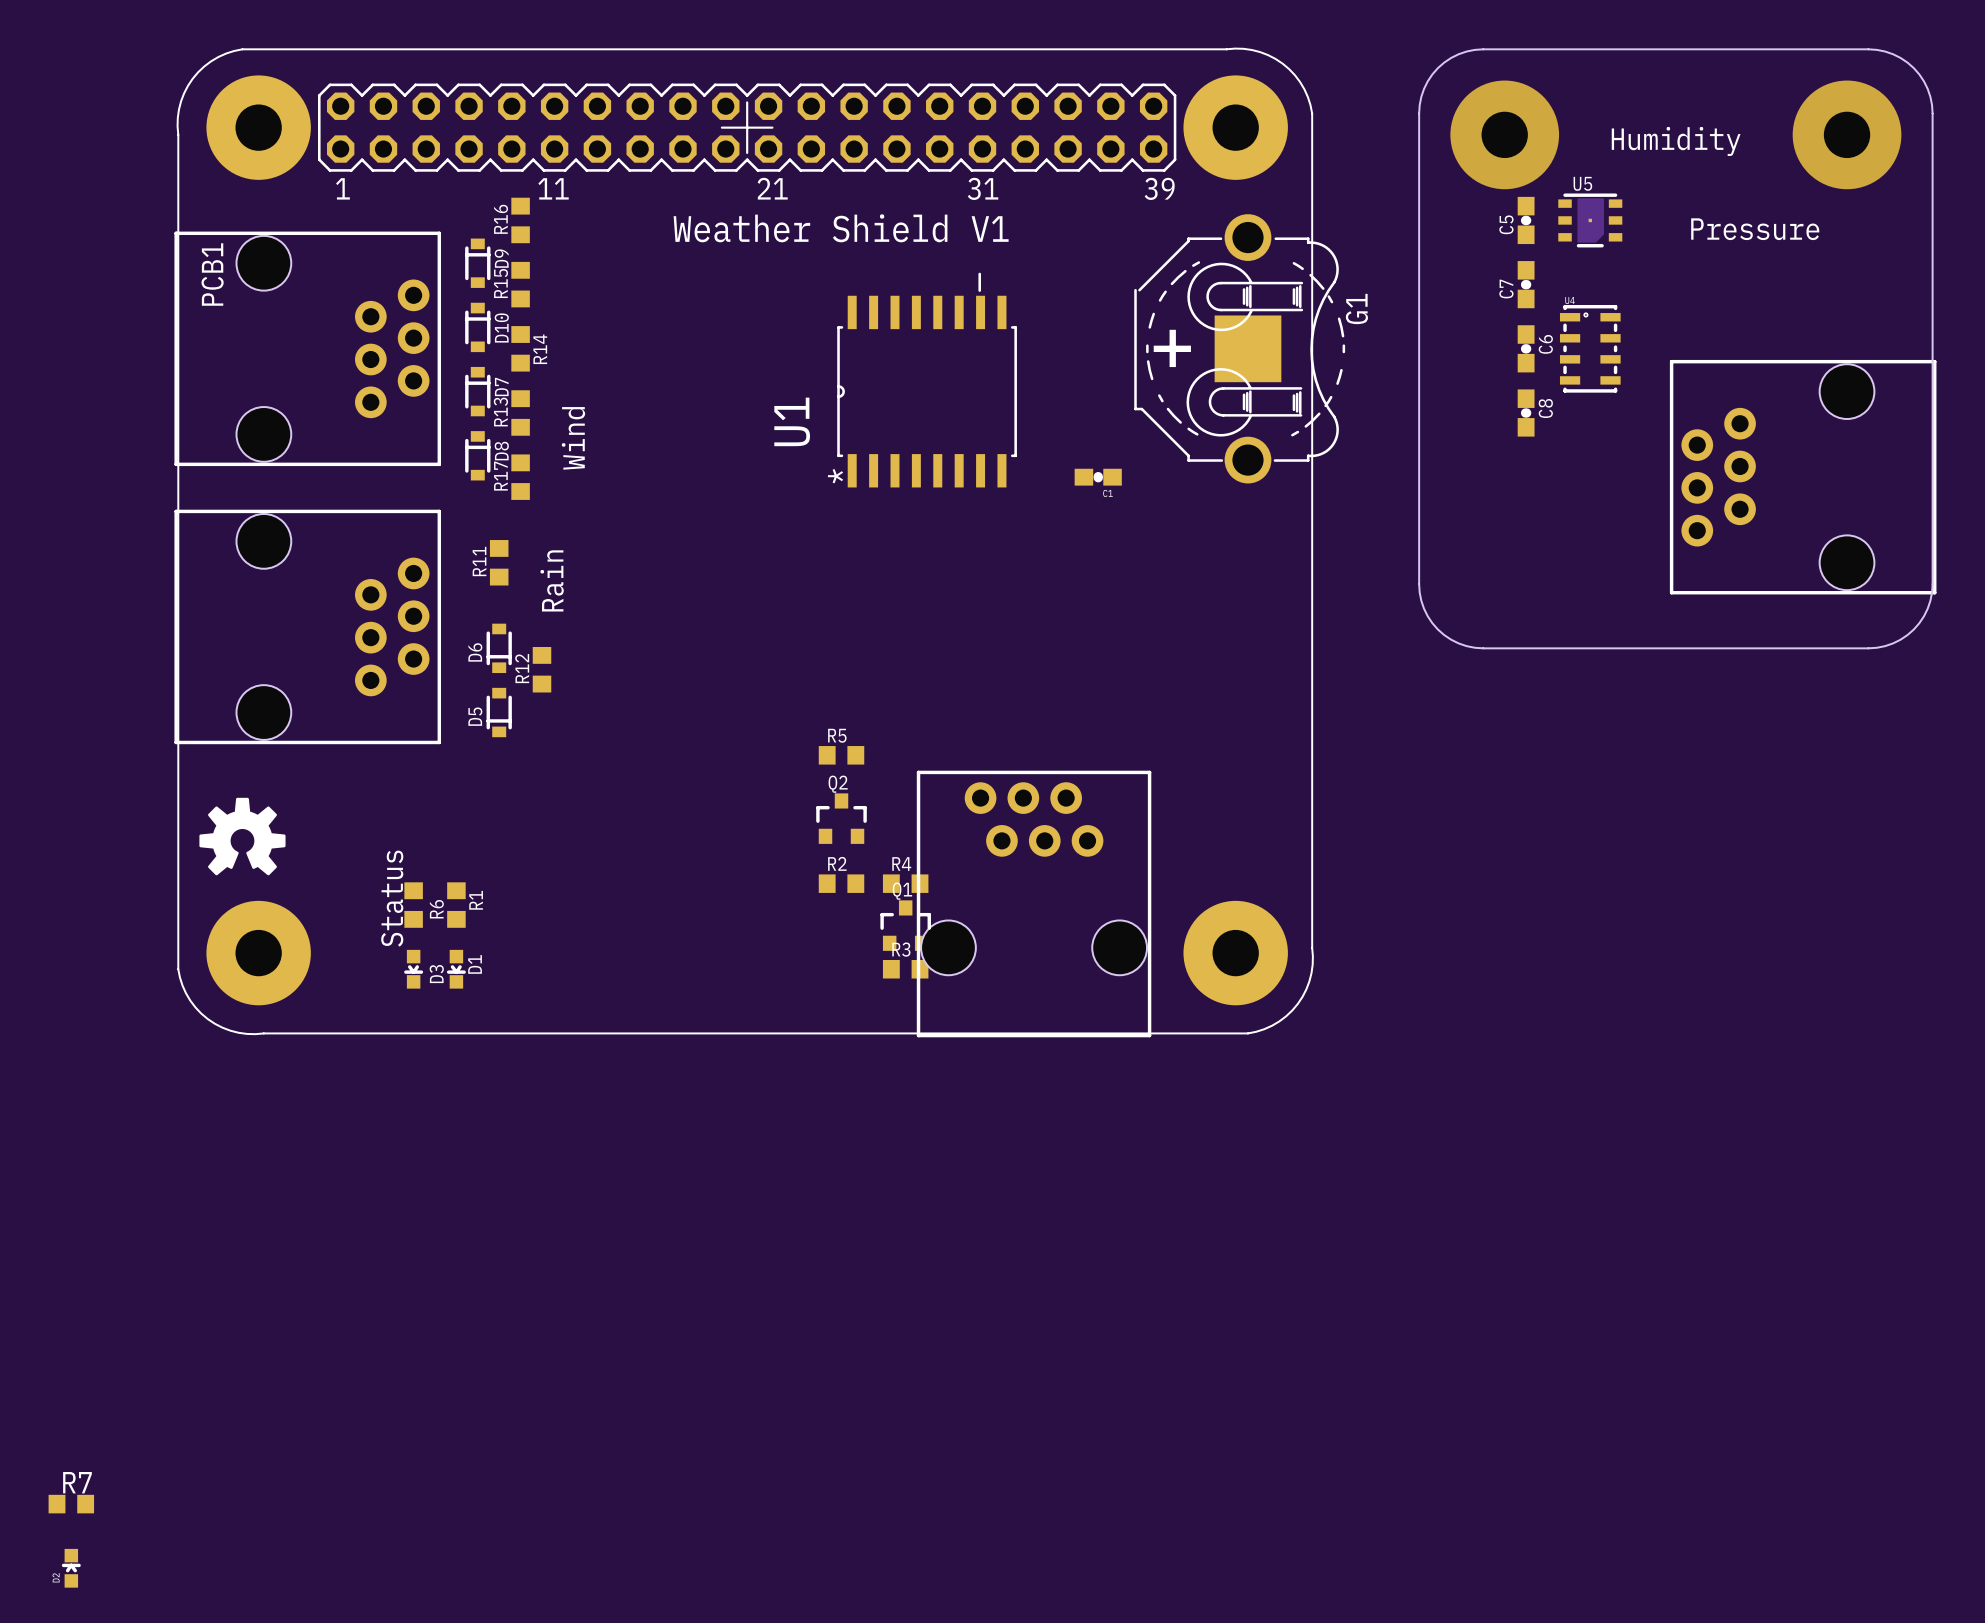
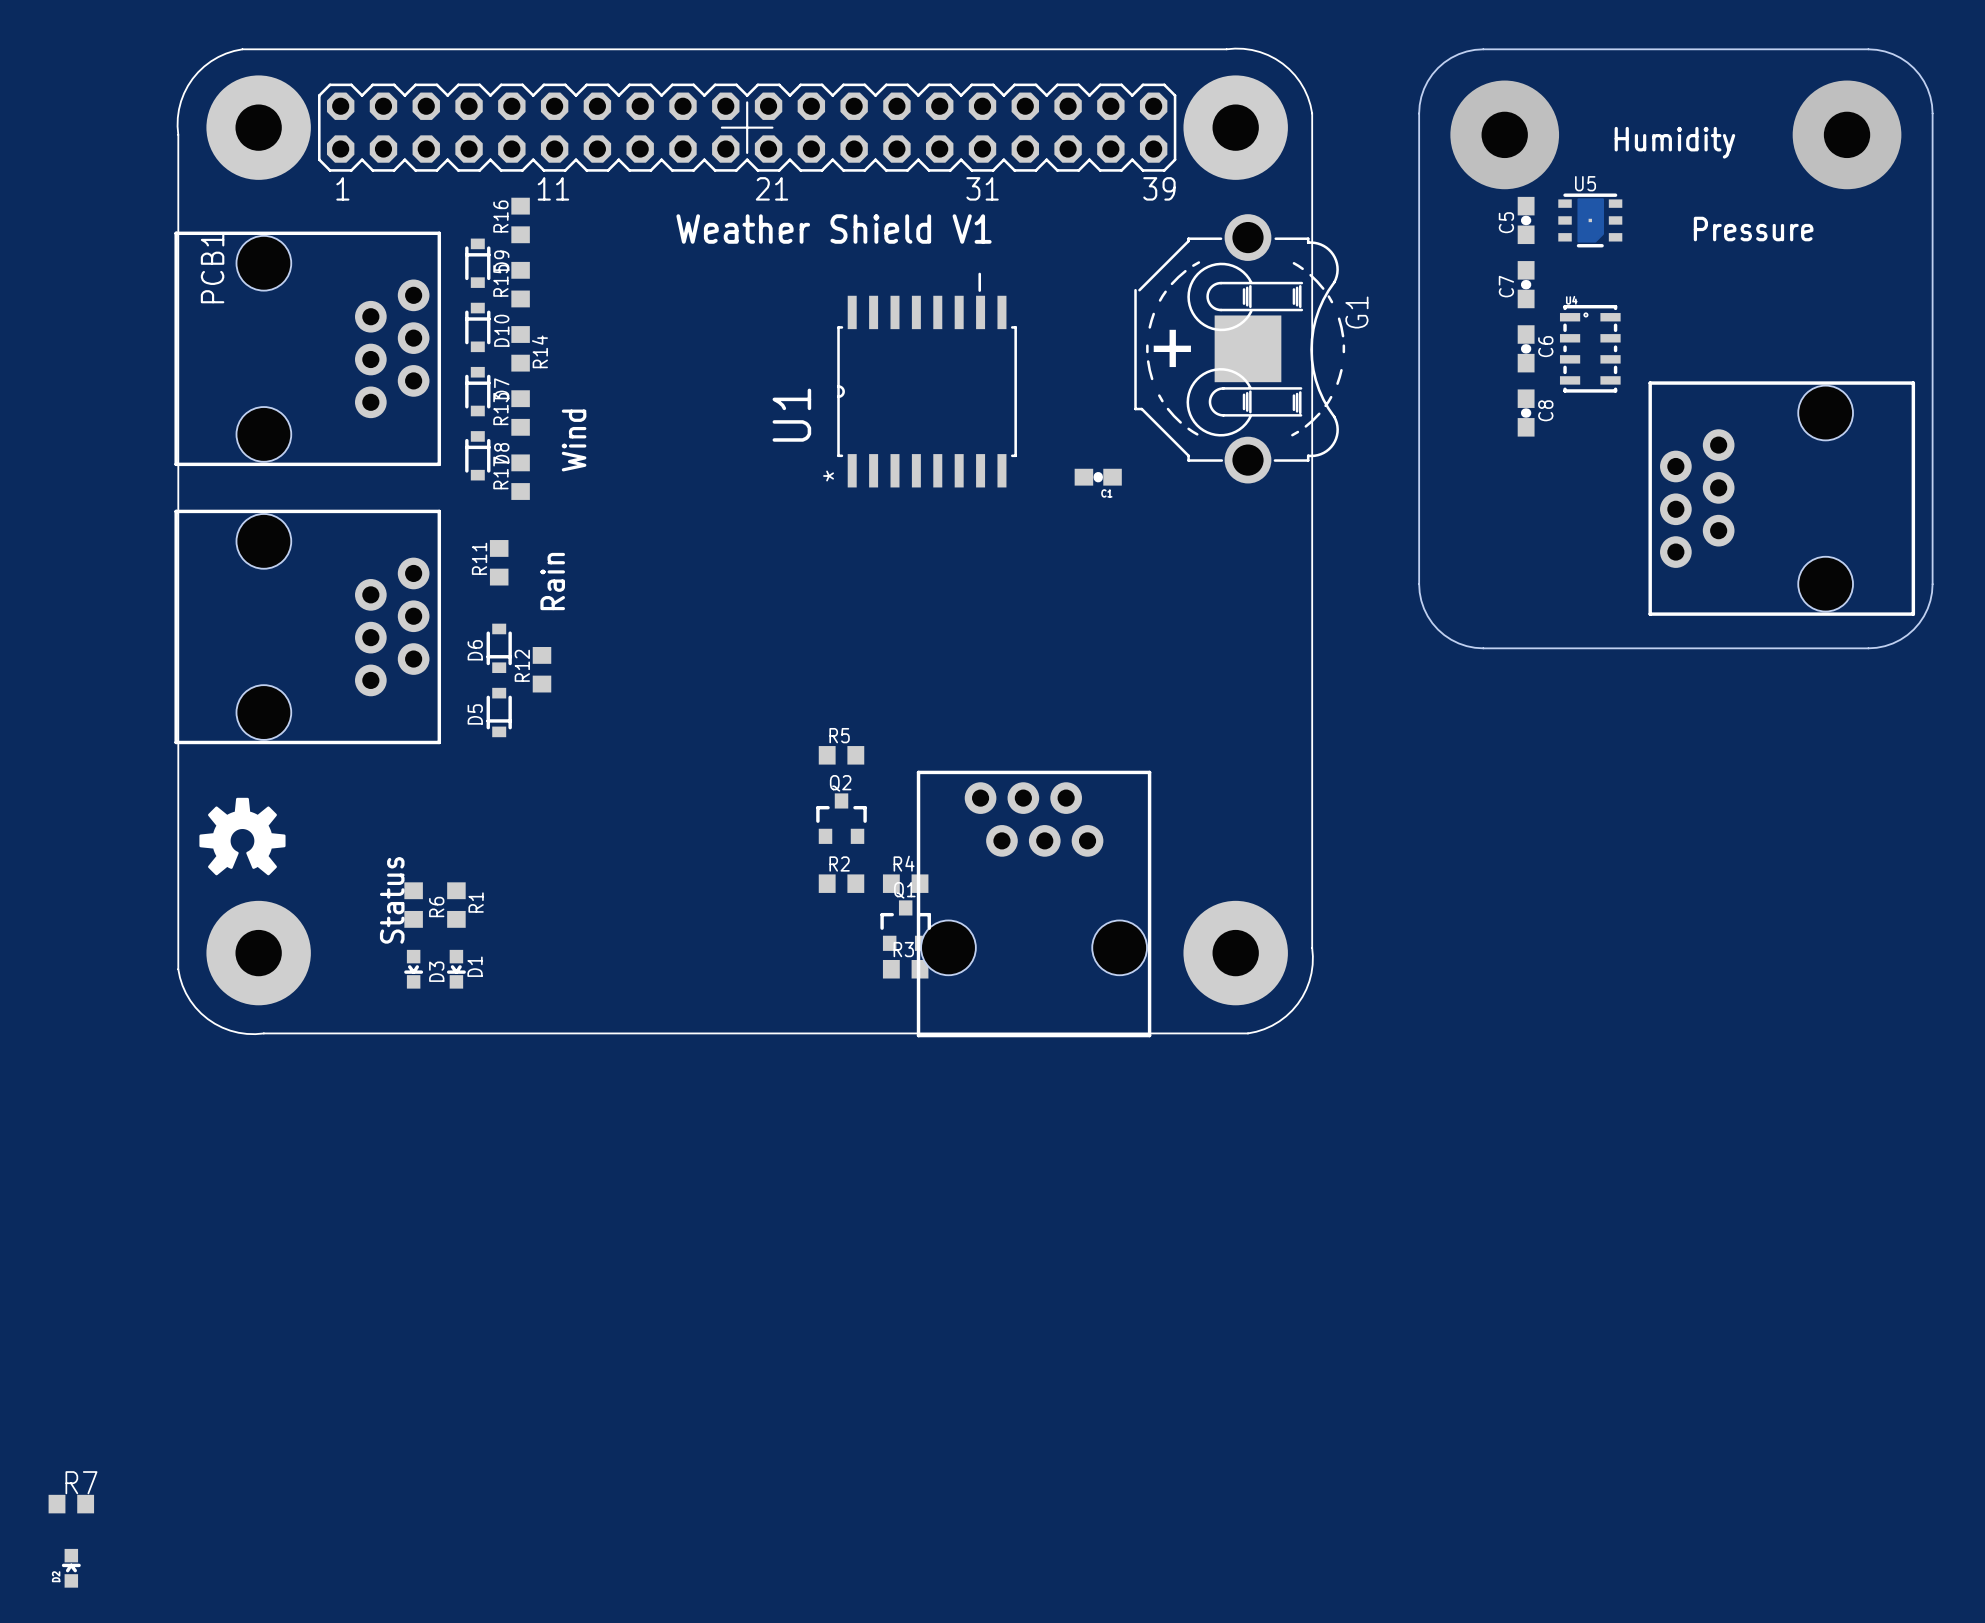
part position: (1803, 477) -> (1781, 498)

